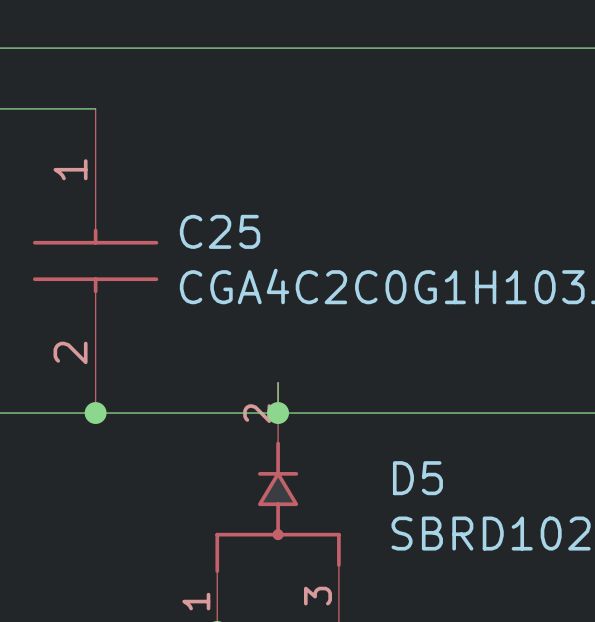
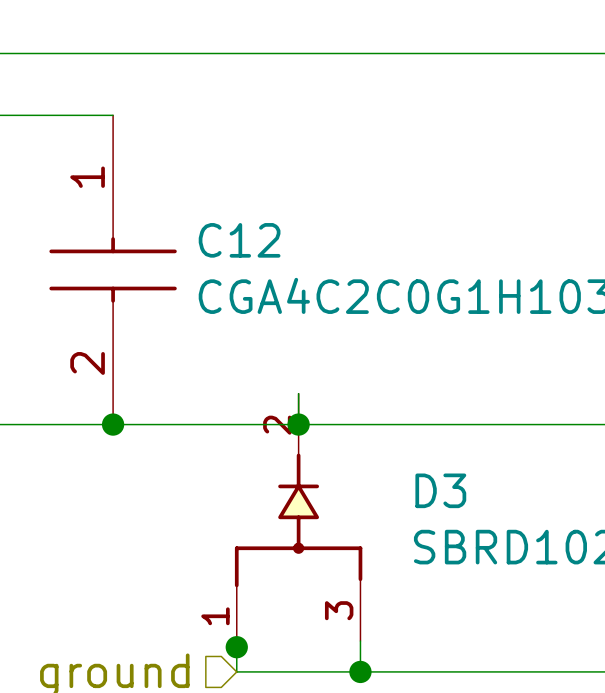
C25 name: C25 (220, 231) -> C12 (239, 240)
D5 name: D5 (417, 478) -> D3 (440, 490)

